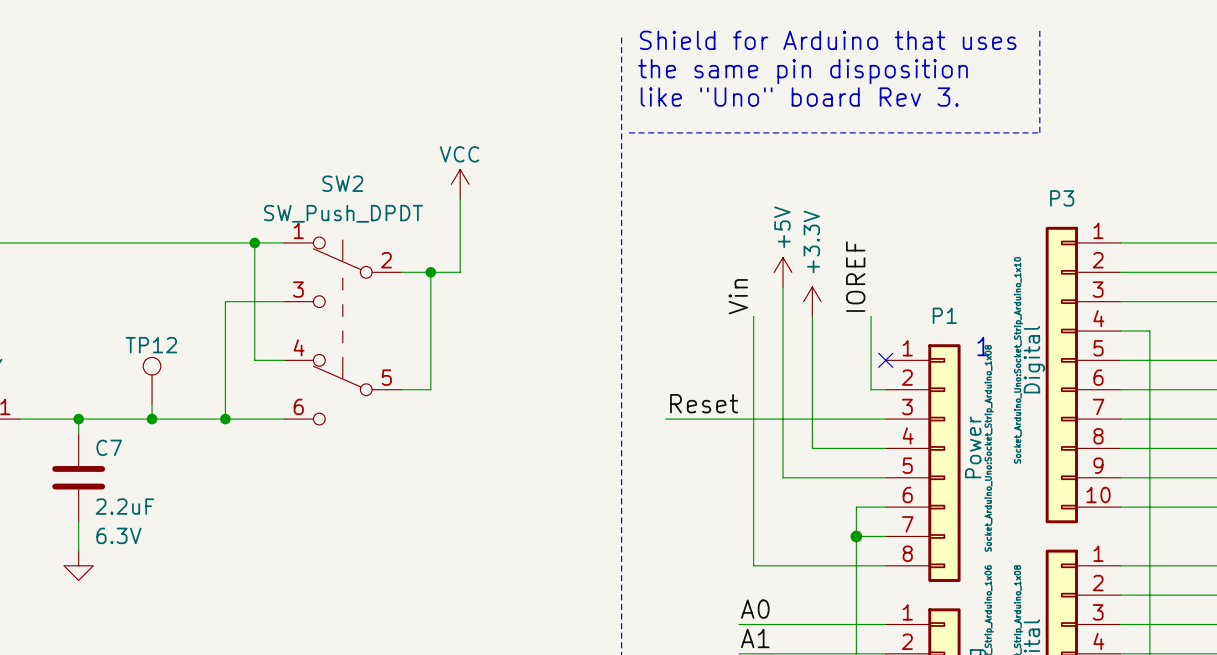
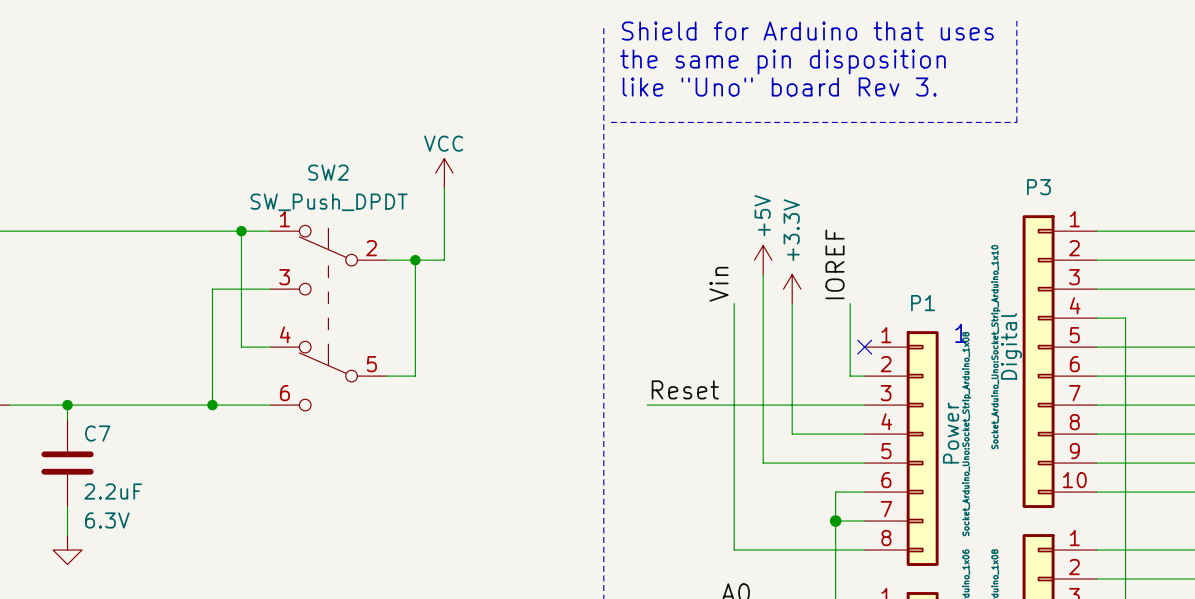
TP12: (152, 380) -> none
wire: (152, 404) (152, 419) -> none
junction: (152, 419) -> none

